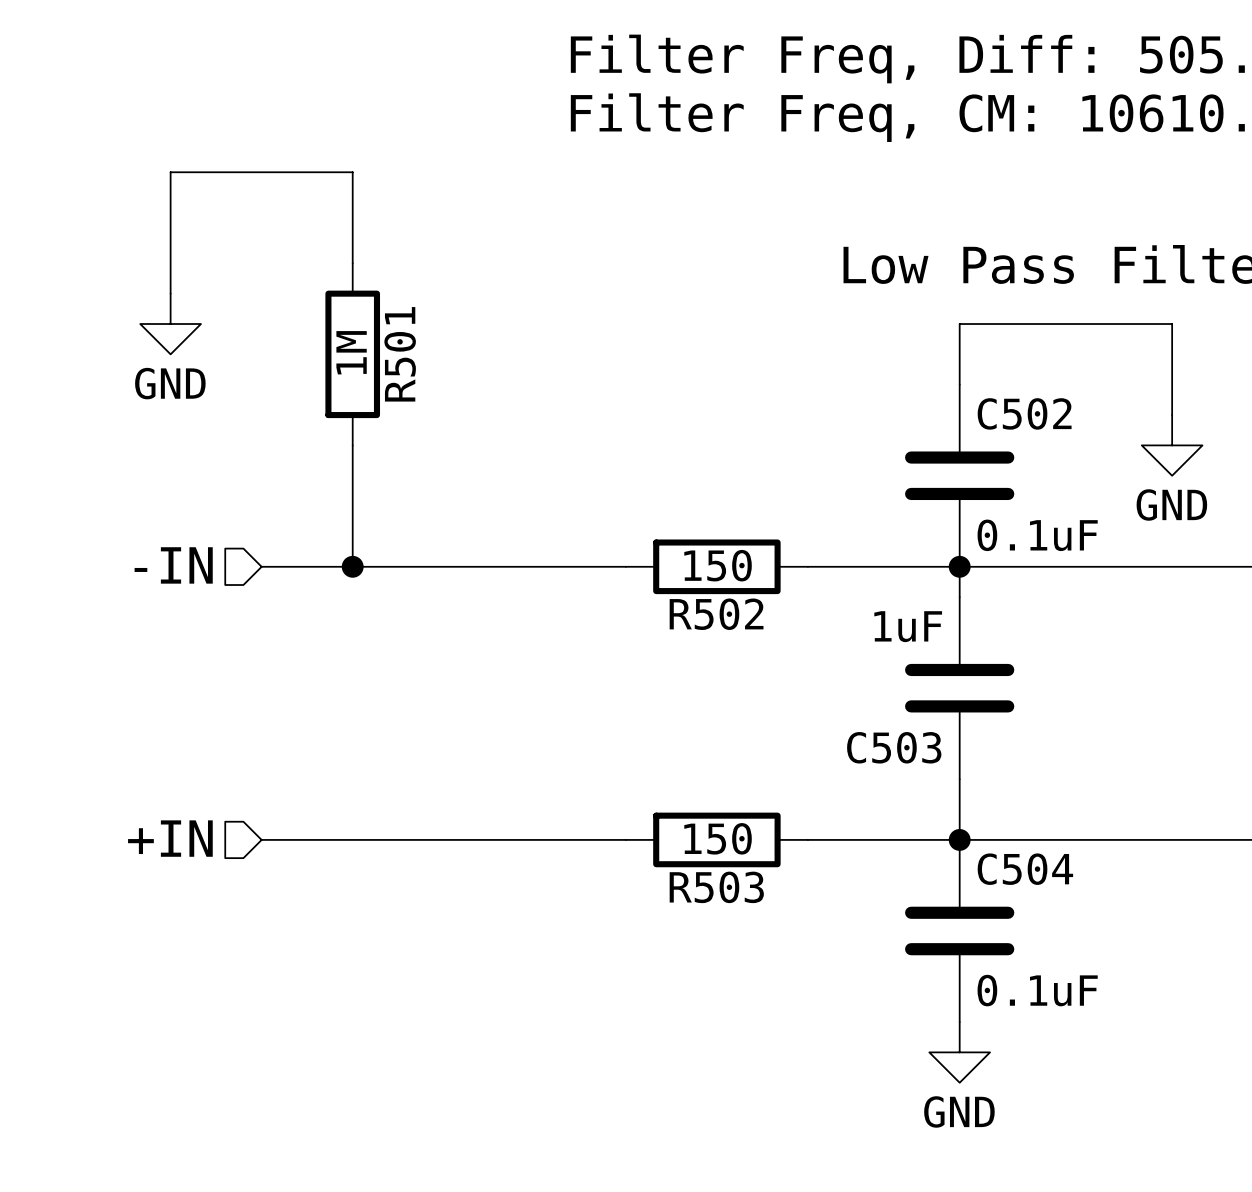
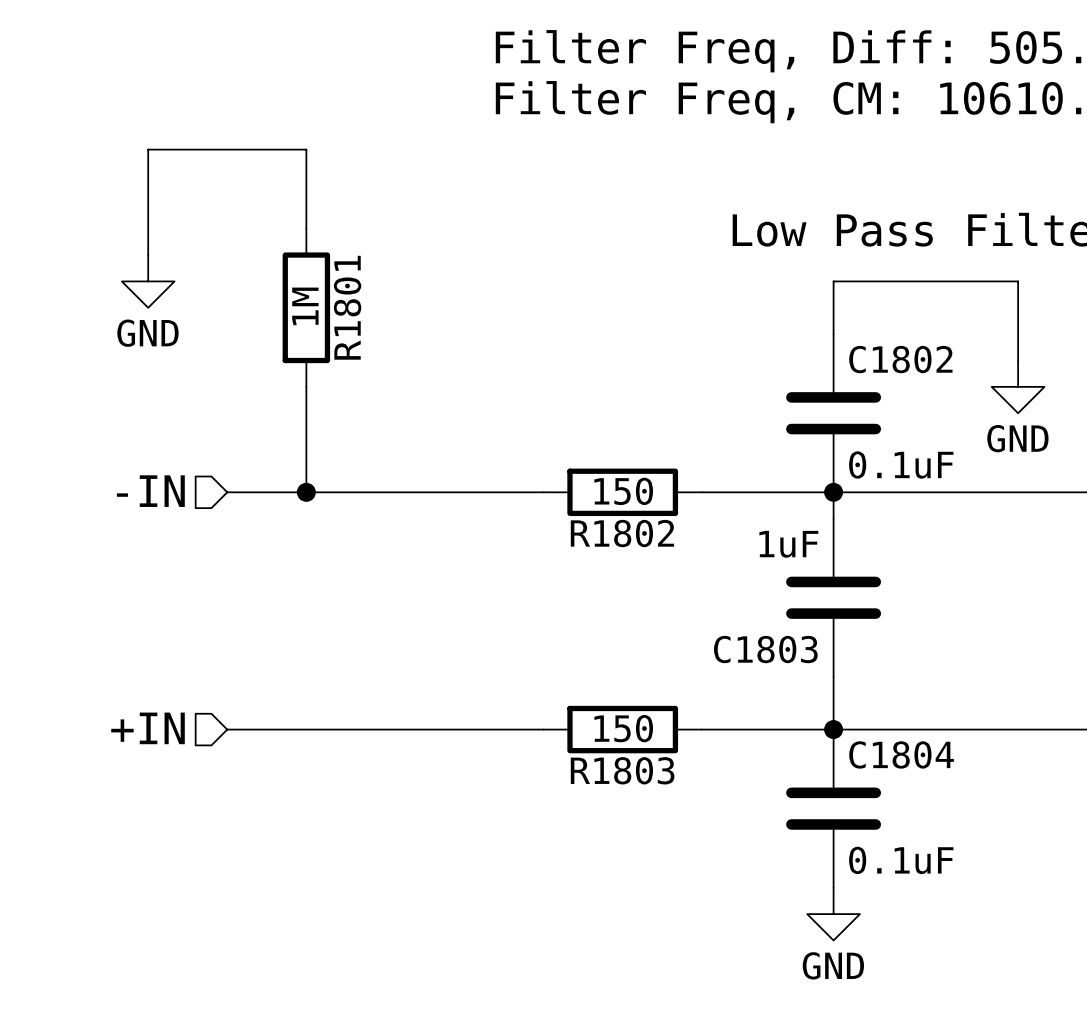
R501 name: R501 (400, 354) -> R1801 (347, 307)
C502 name: C502 (1024, 413) -> C1802 (900, 359)
R502 name: R502 (716, 614) -> R1802 (622, 533)
C503 name: C503 (894, 747) -> C1803 (765, 649)
C504 name: C504 (1025, 869) -> C1804 (901, 754)
R503 name: R503 (716, 887) -> R1803 (622, 770)

